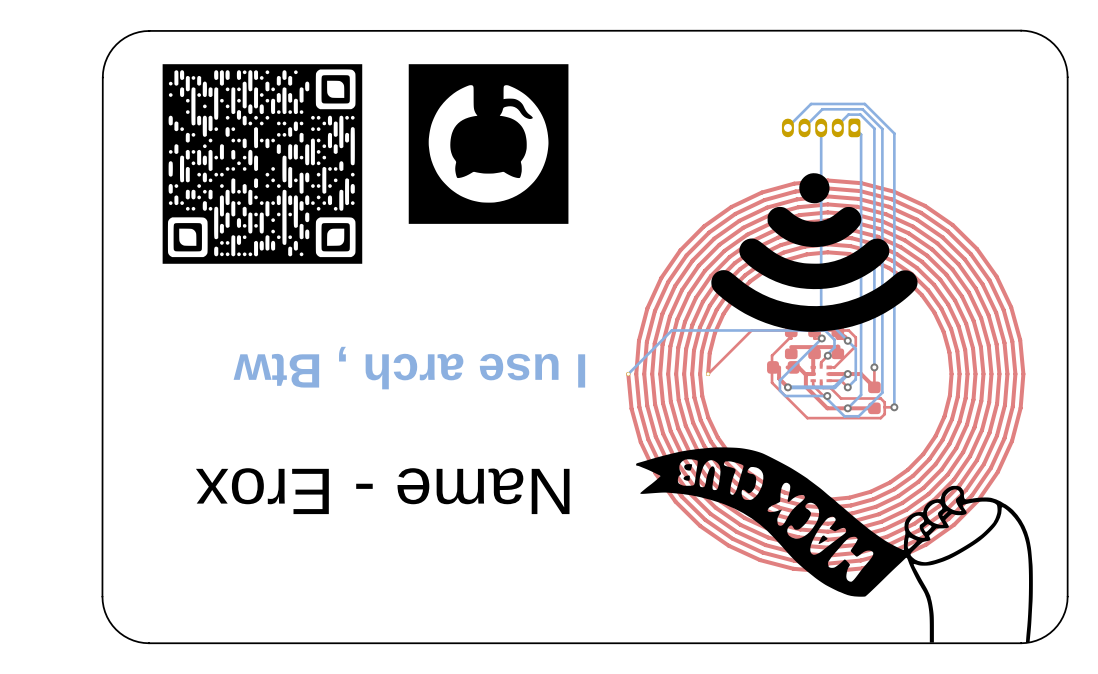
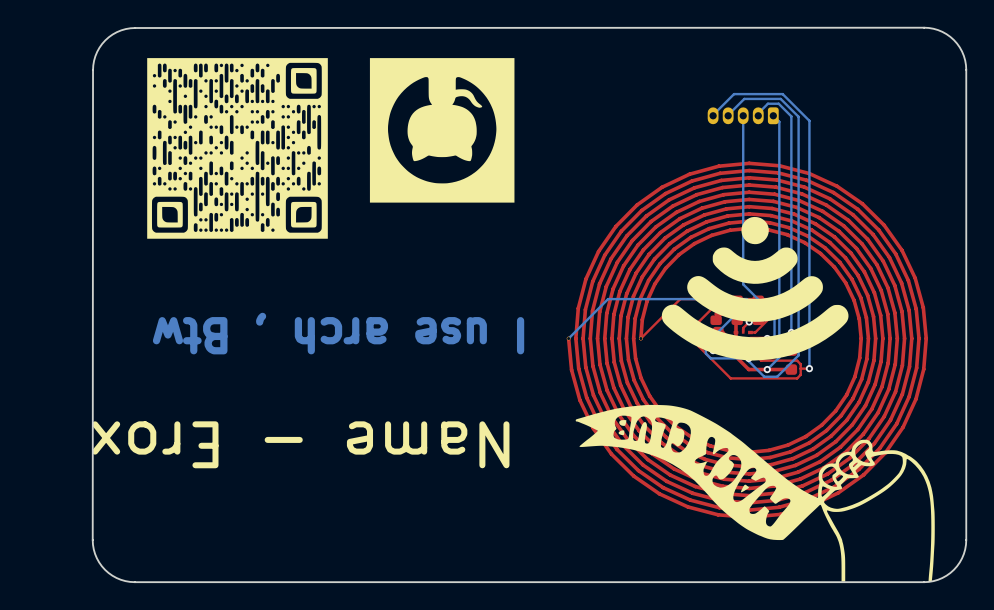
drawing position: (814, 252) -> (755, 288)

